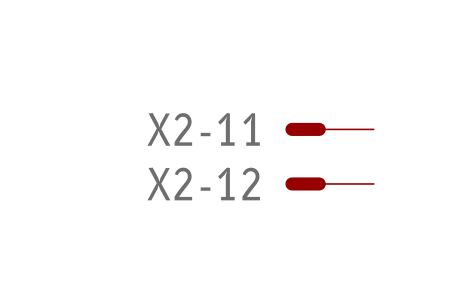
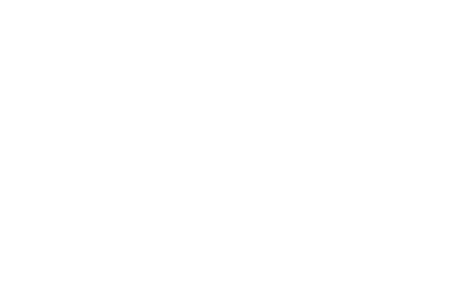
X2-11: (329, 129) -> none
X2-12: (329, 183) -> none

